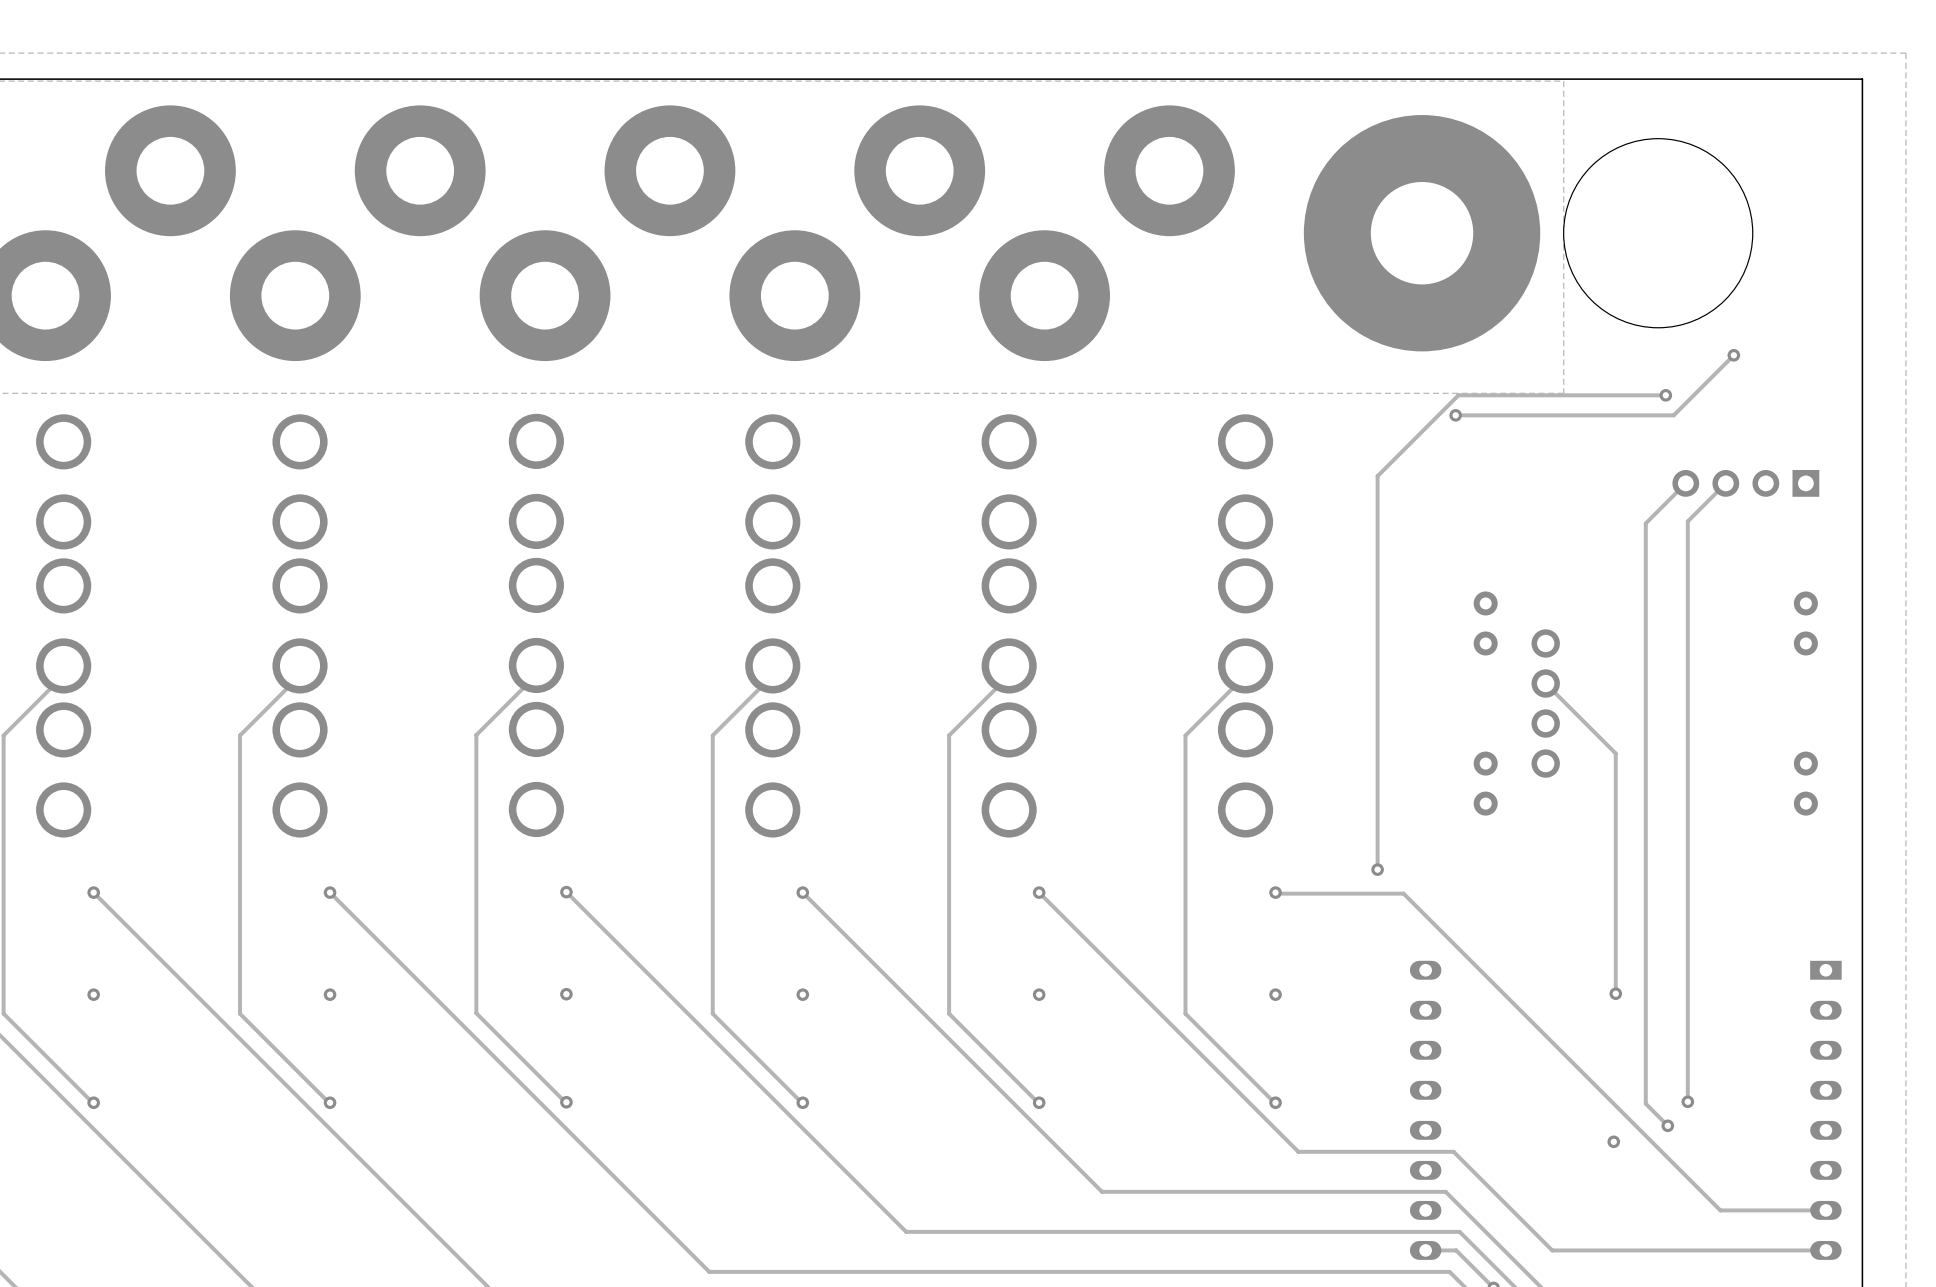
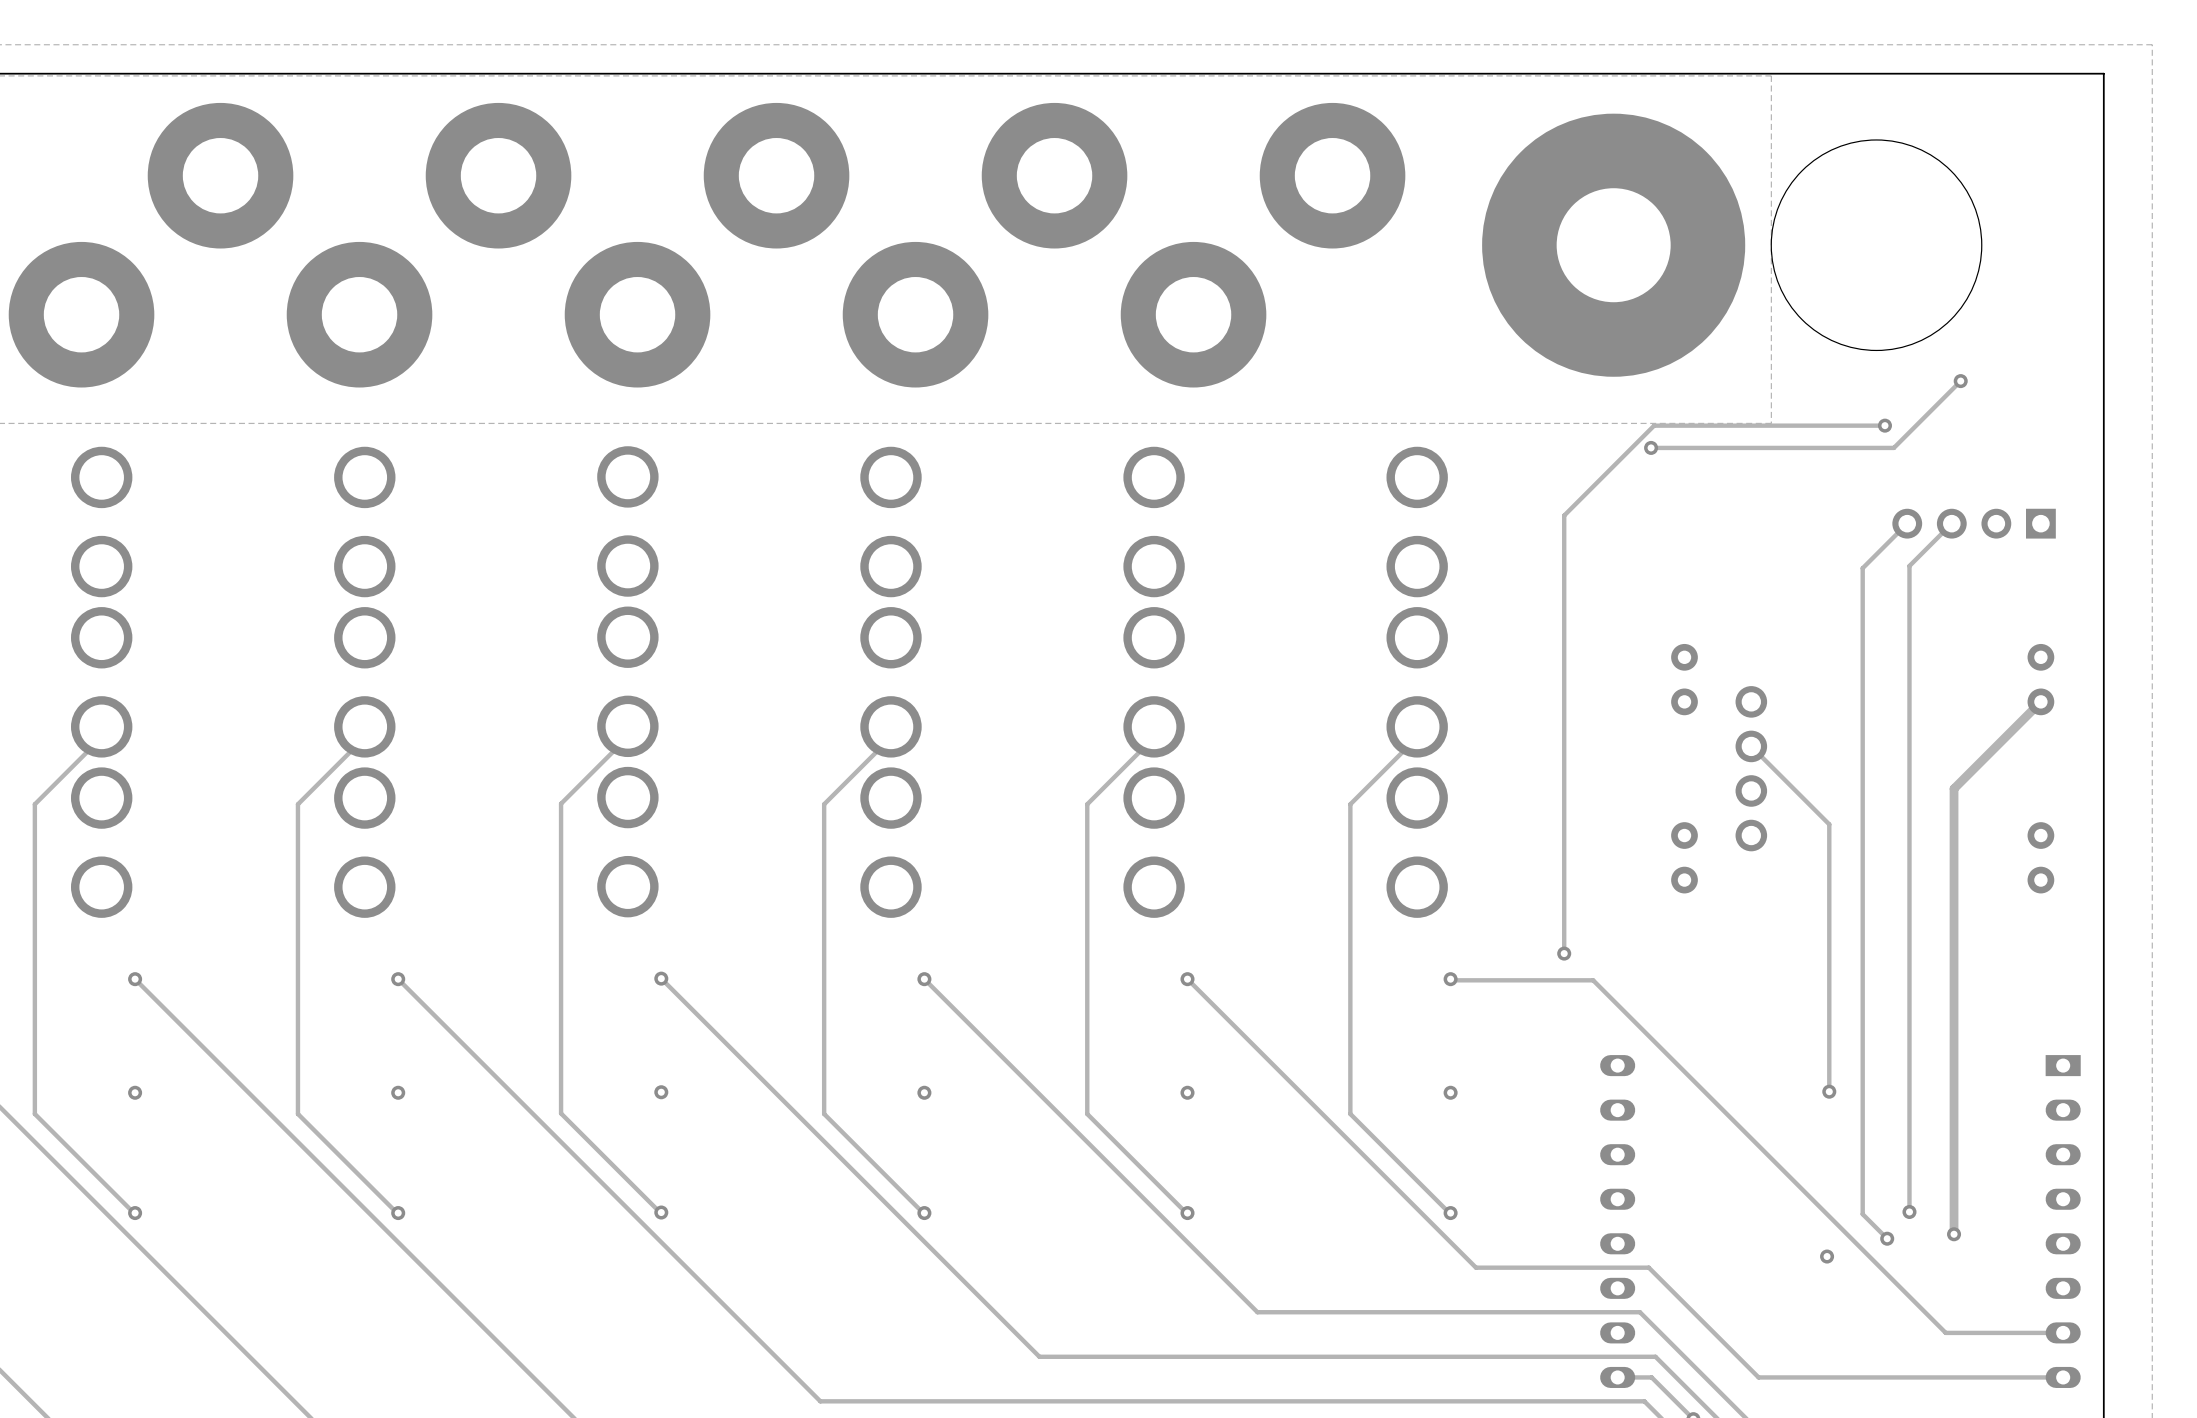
track: none -> (2040, 701) (1954, 788) (1954, 1234)
via: none -> (1954, 1234)

